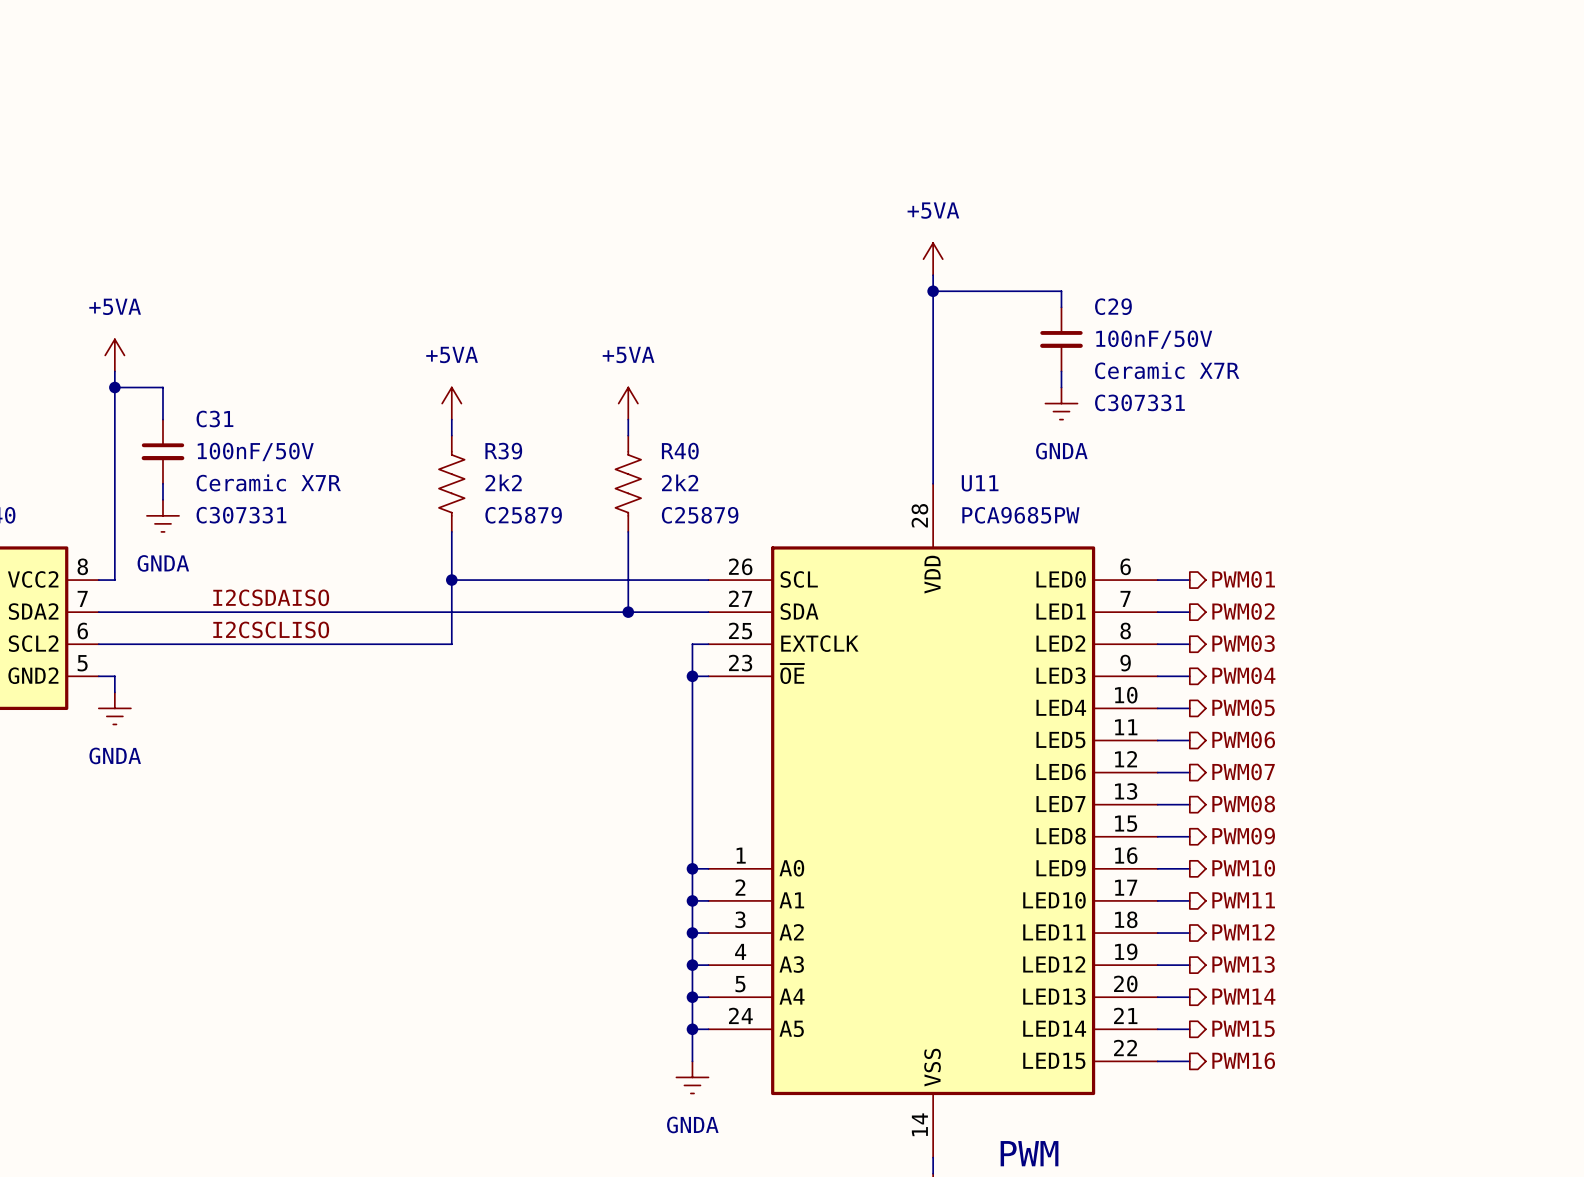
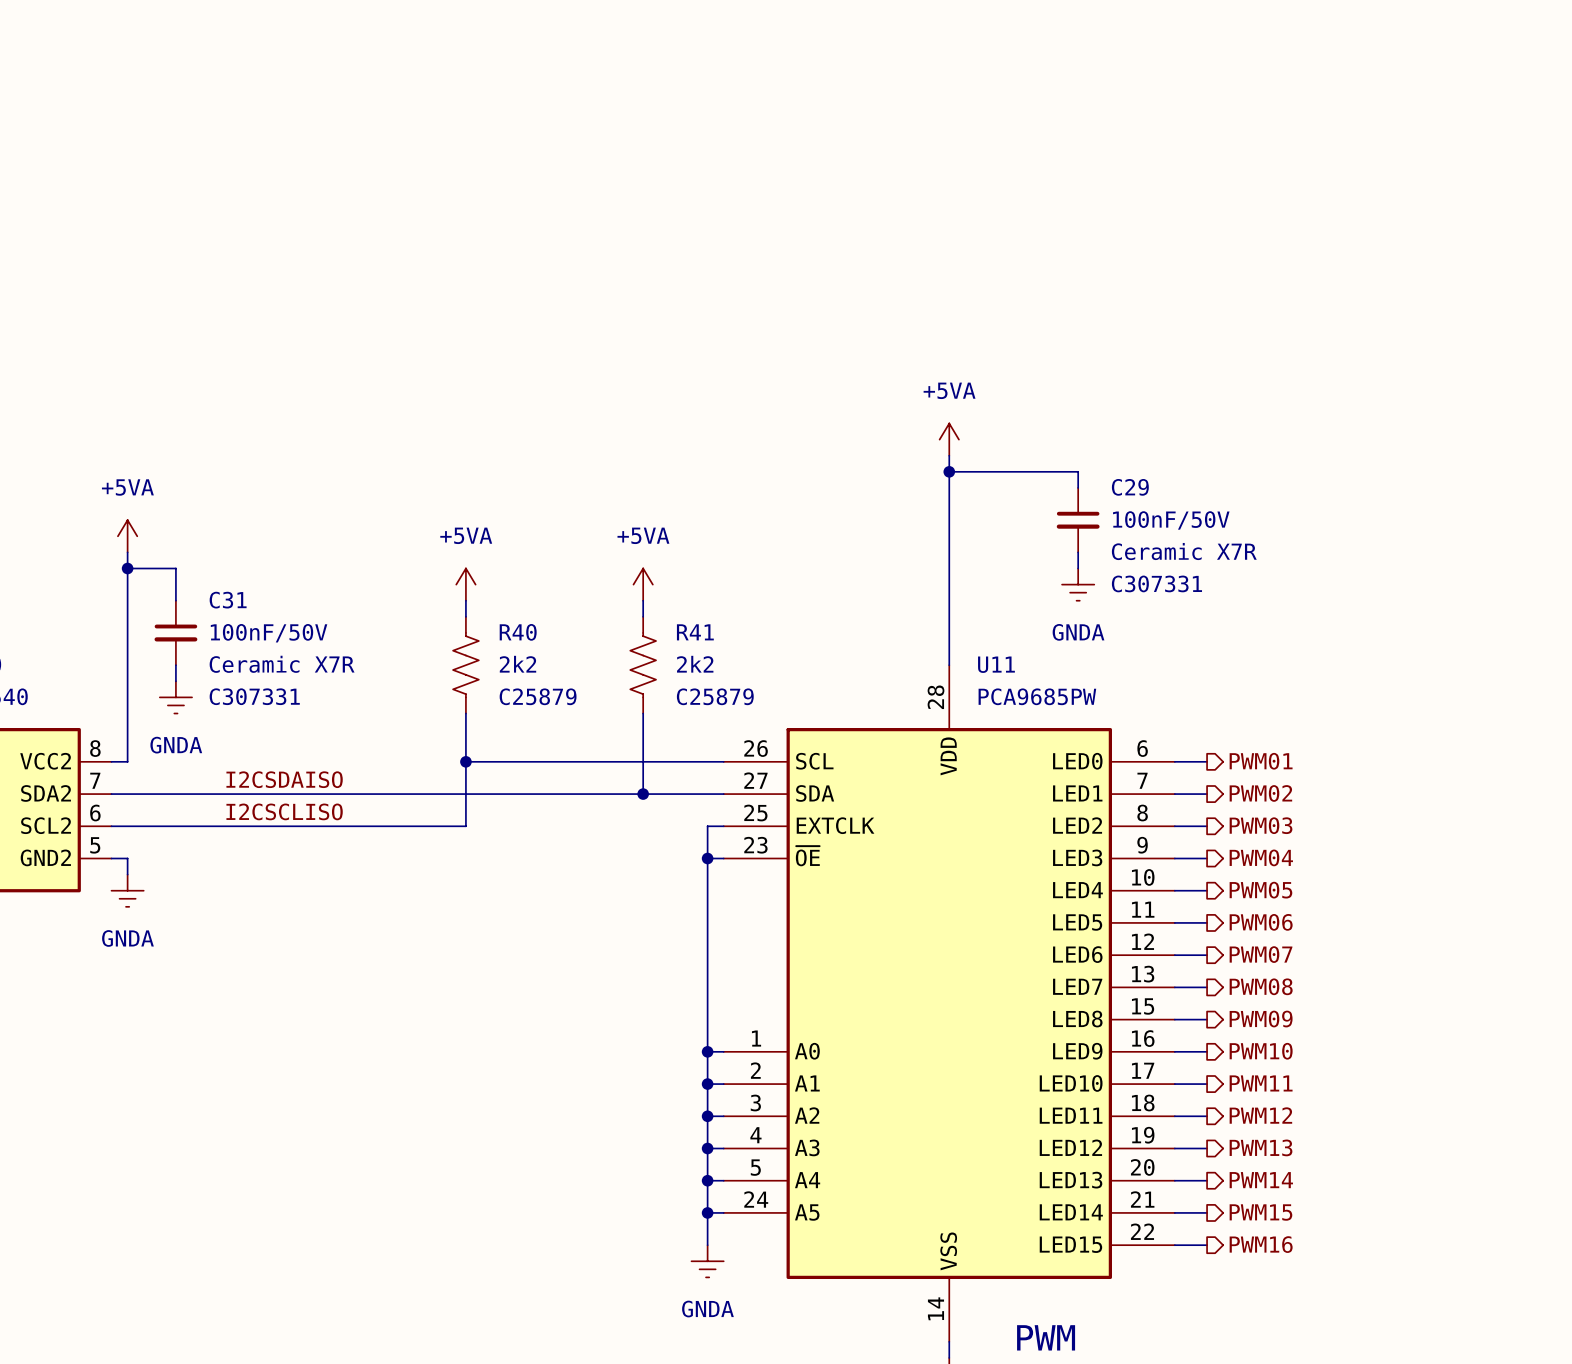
R39 name: R39 (503, 451) -> R40 (518, 632)
R40 name: R40 (680, 451) -> R41 (695, 632)

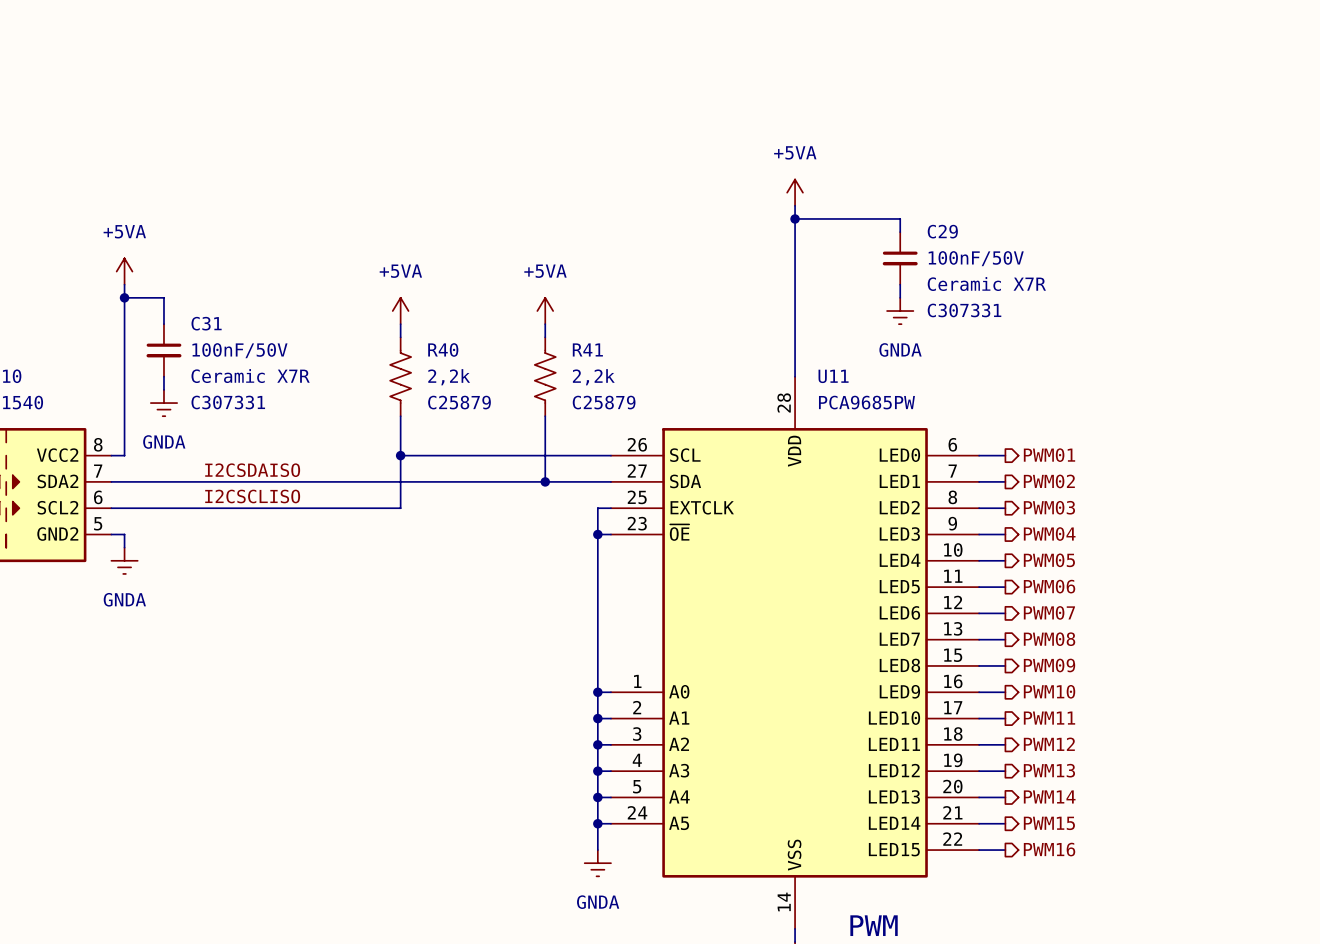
R40 value: 2k2 (518, 664) -> 2,2k (449, 377)
R41 value: 2k2 (695, 664) -> 2,2k (593, 377)

